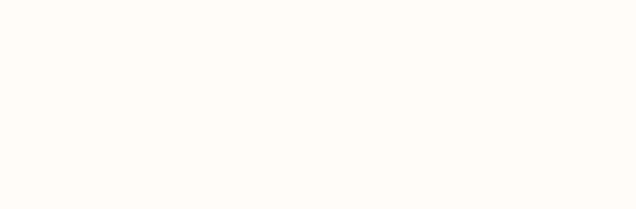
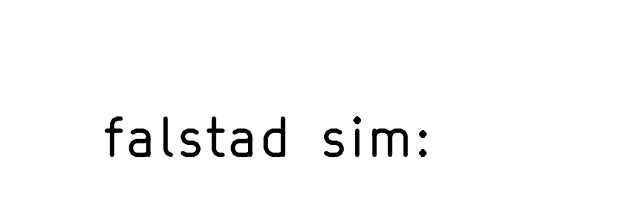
text: none -> falstad sim: (265, 136)

